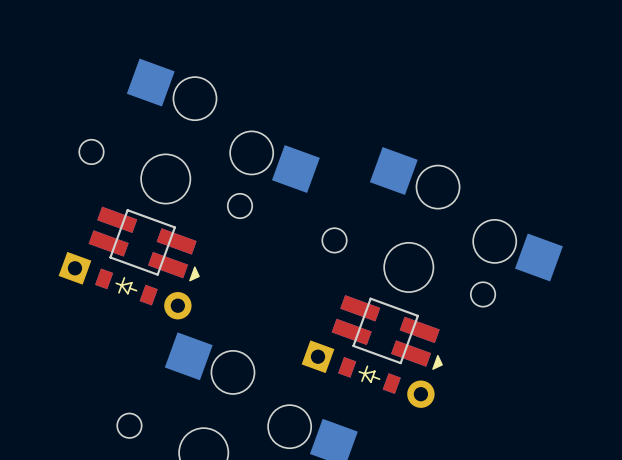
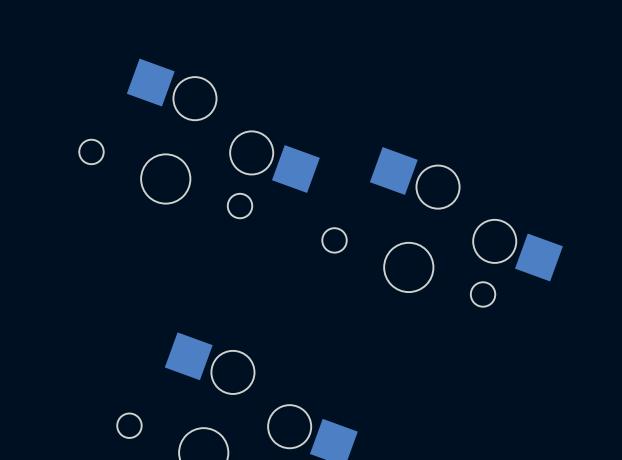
part: (144, 244) -> none
part: (125, 285) -> none
part: (387, 332) -> none
part: (368, 374) -> none

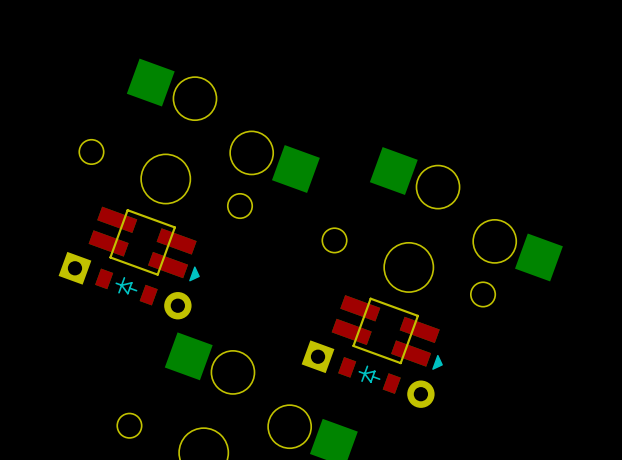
part: none -> (144, 244)
part: none -> (125, 285)
part: none -> (387, 332)
part: none -> (368, 374)

